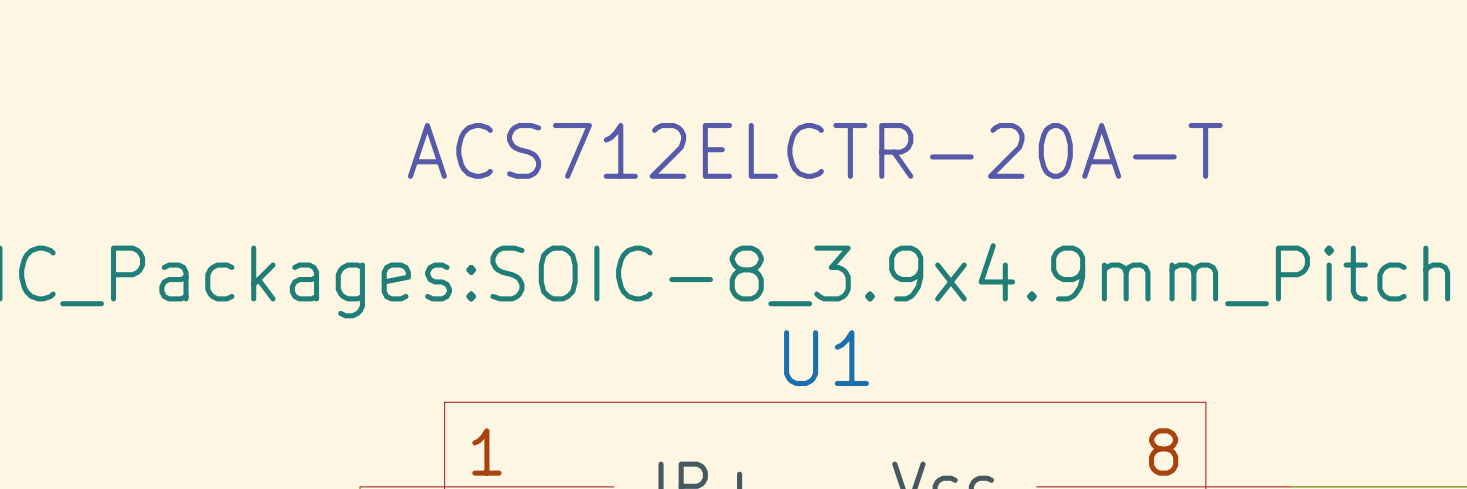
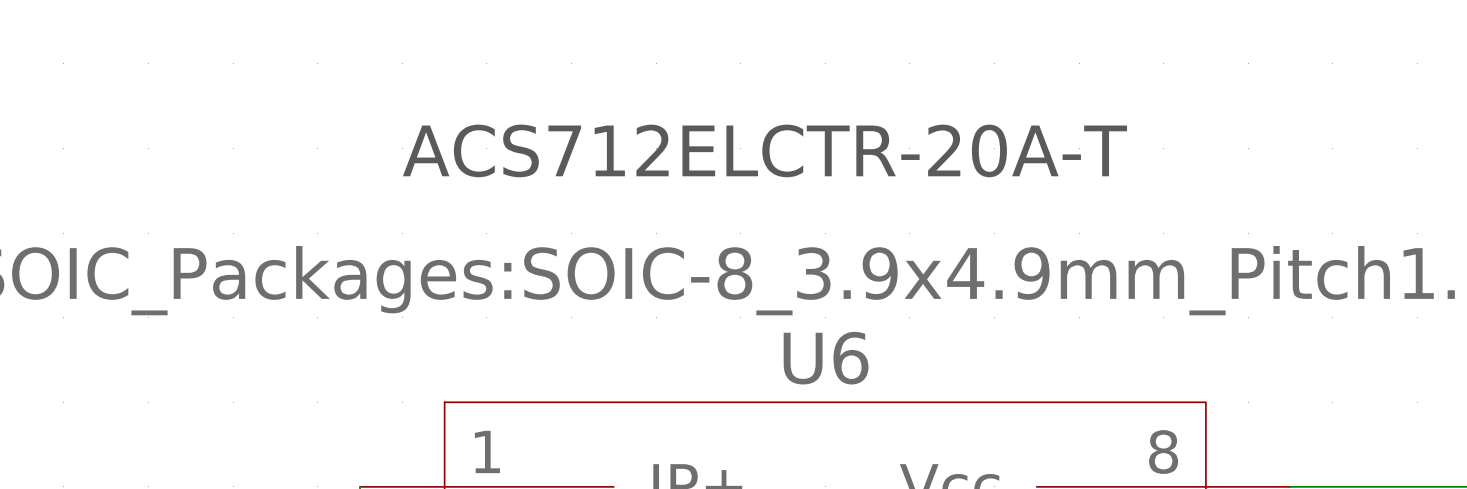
U1 name: U1 (826, 358) -> U6 (826, 358)

